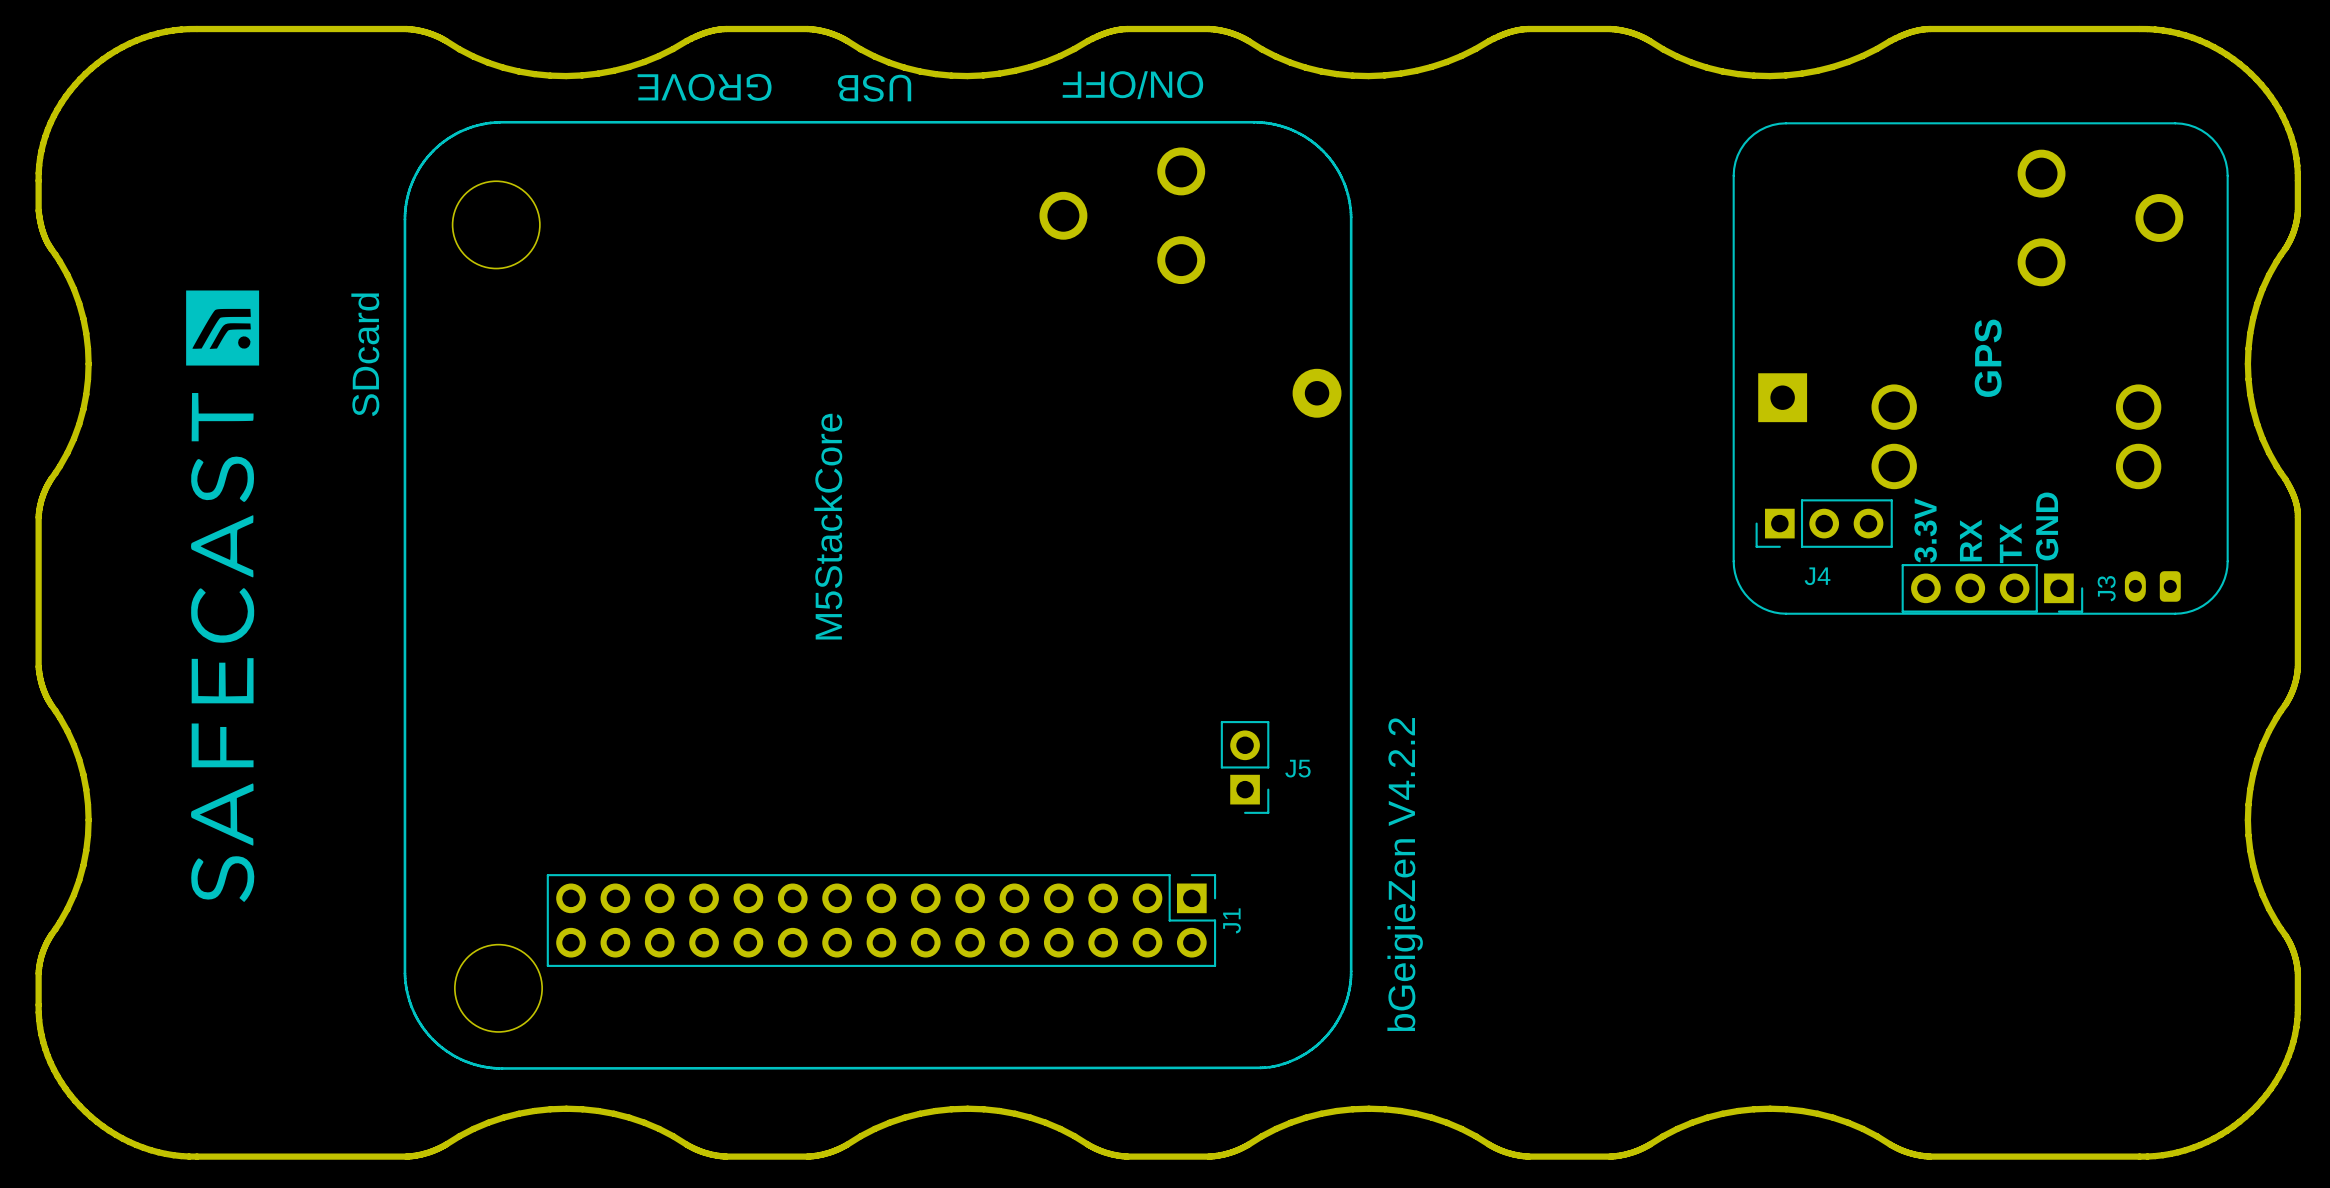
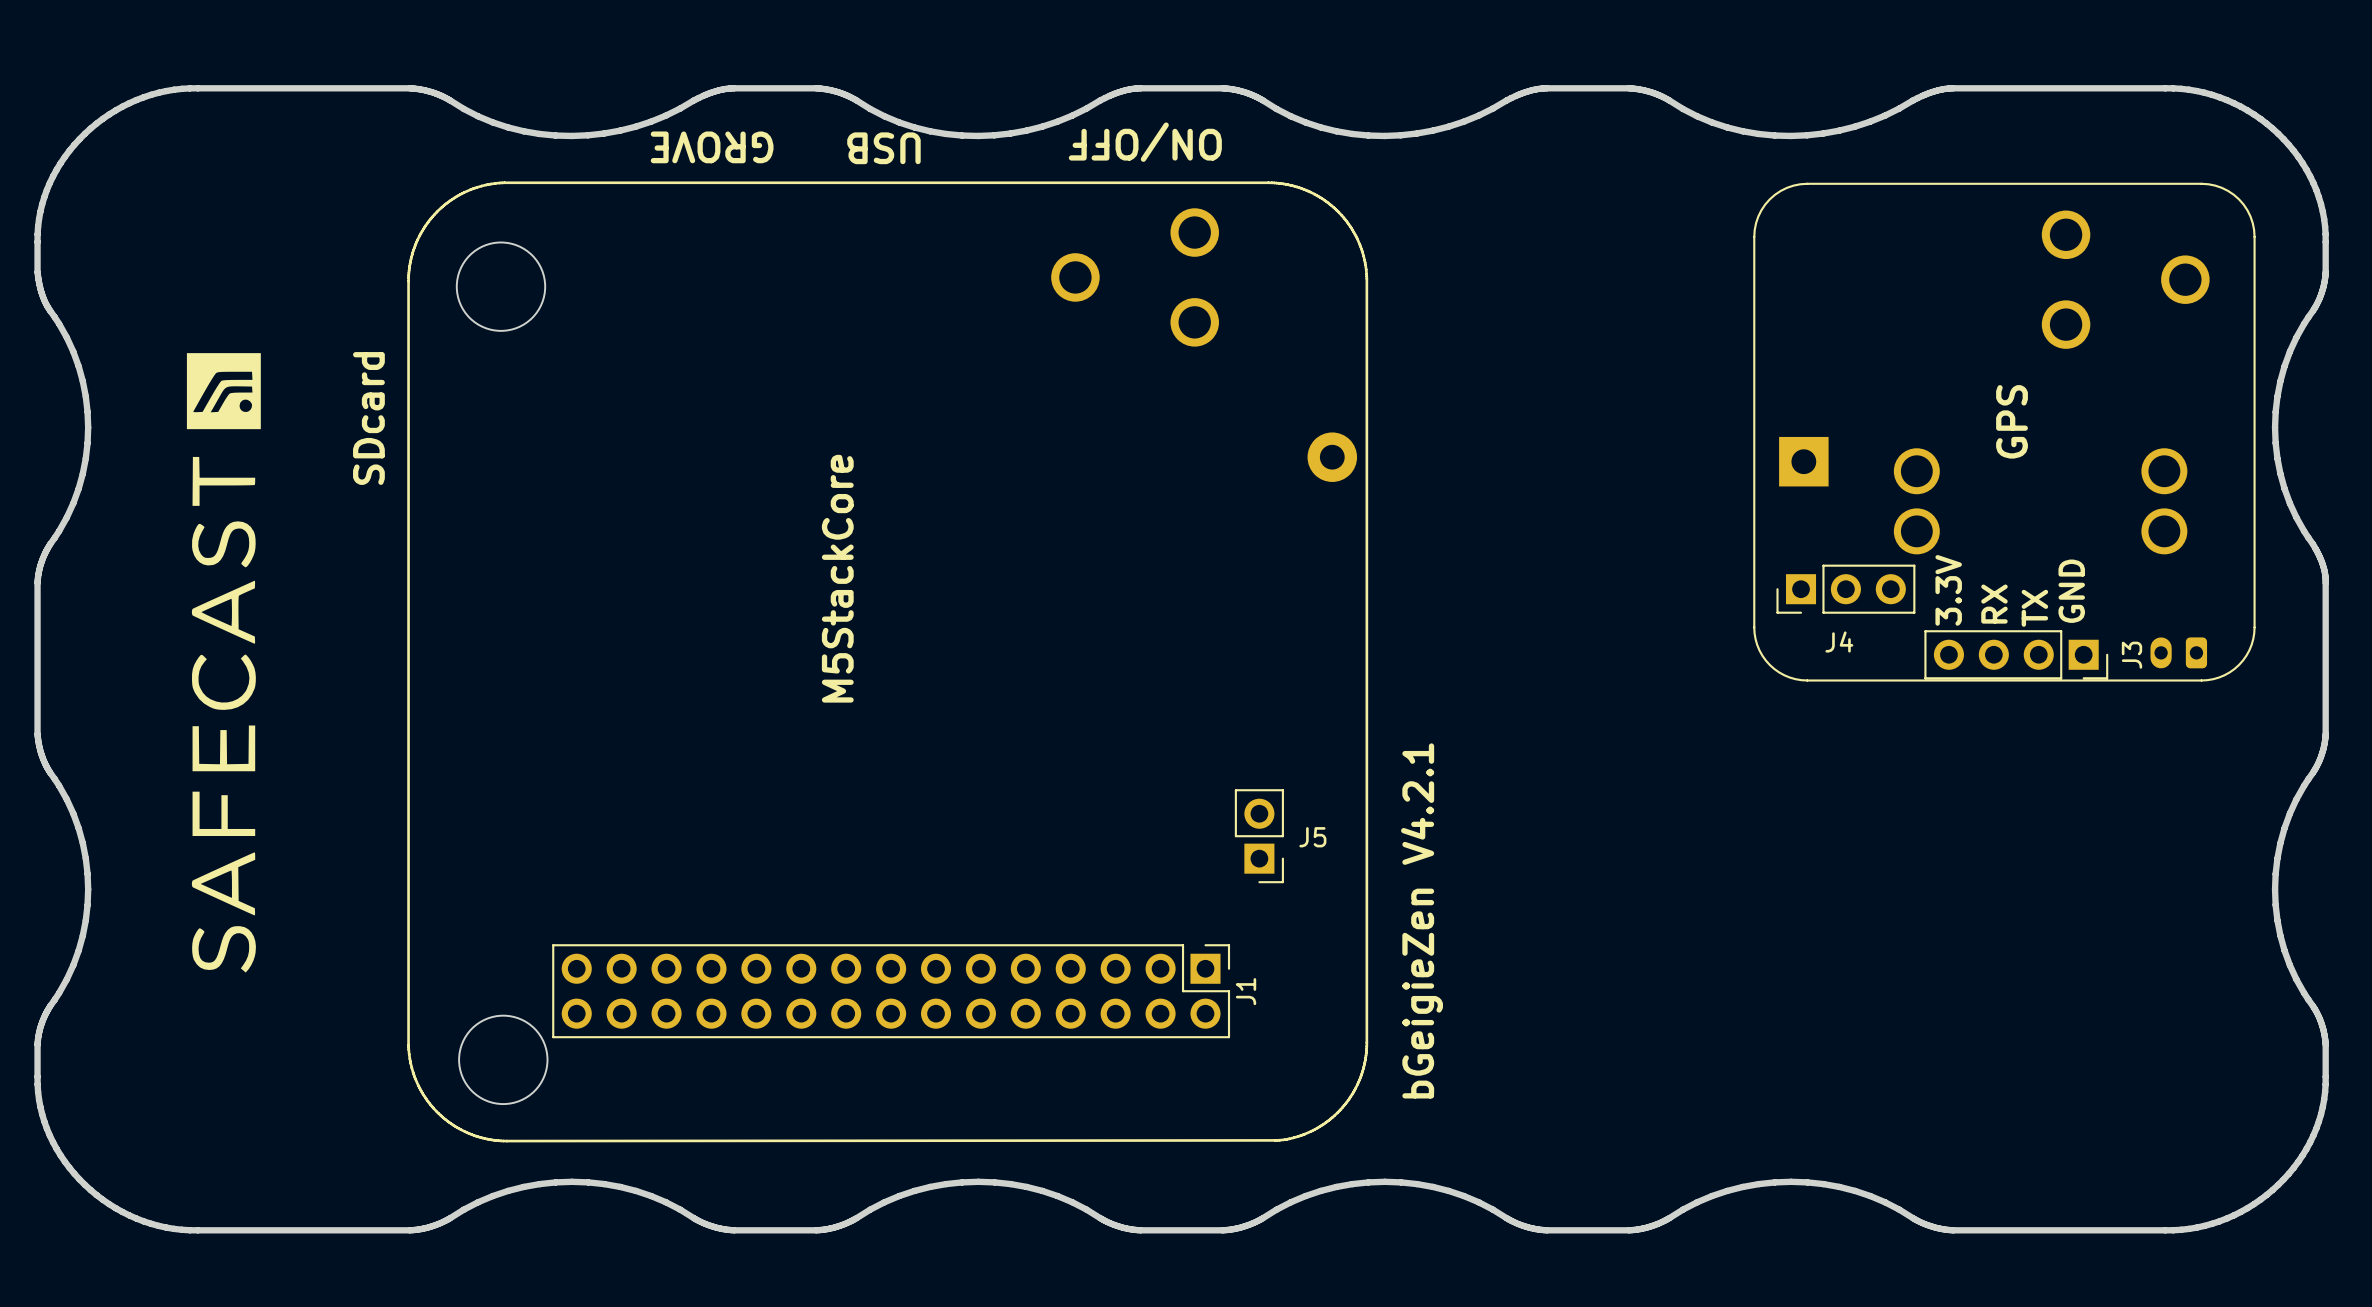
text: bGeigieZen V4.2.2 (1405, 874) -> bGeigieZen V4.2.1 (1422, 920)

